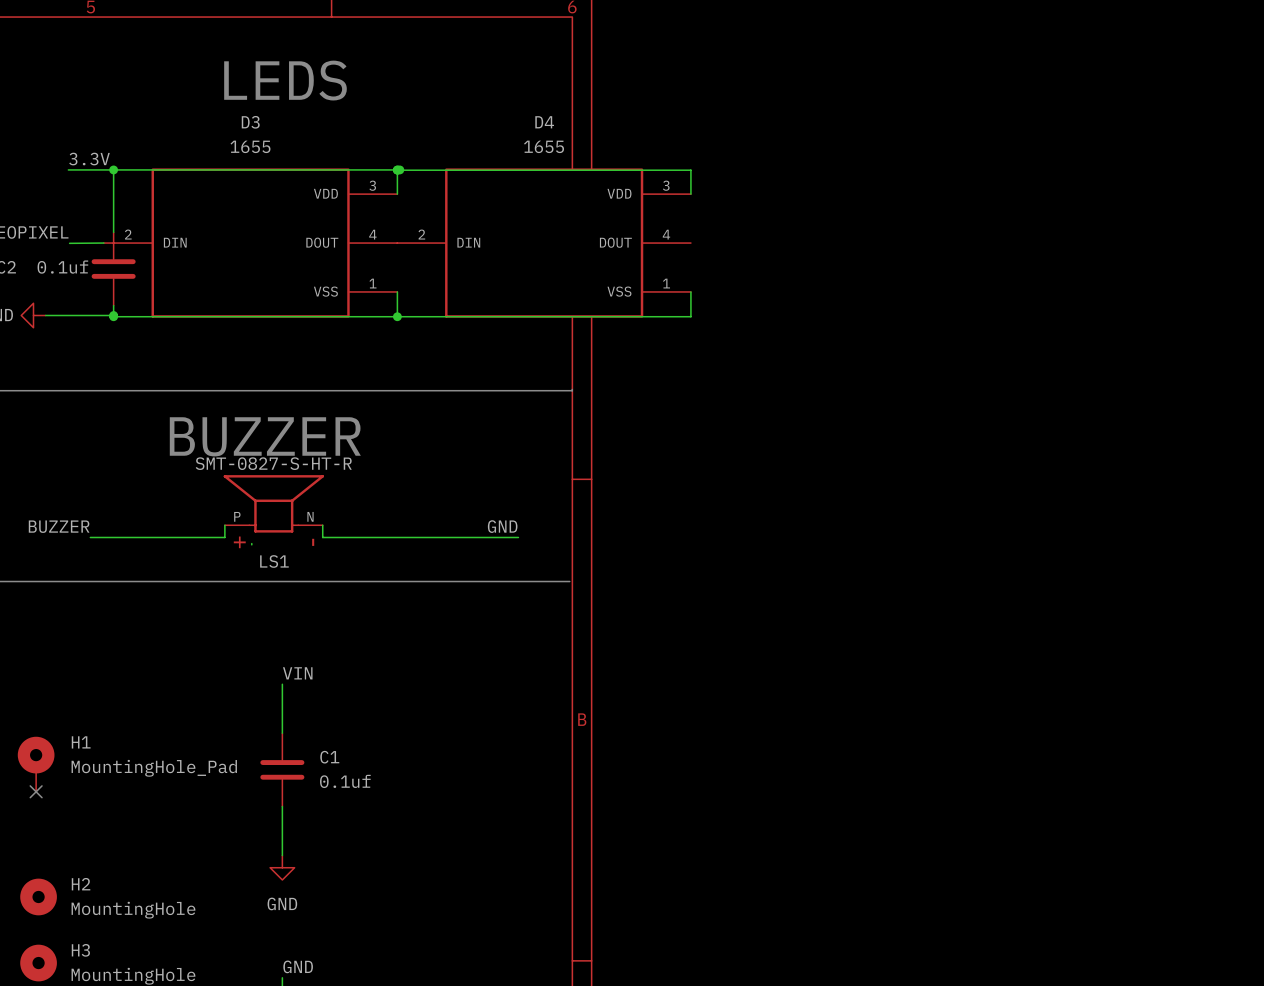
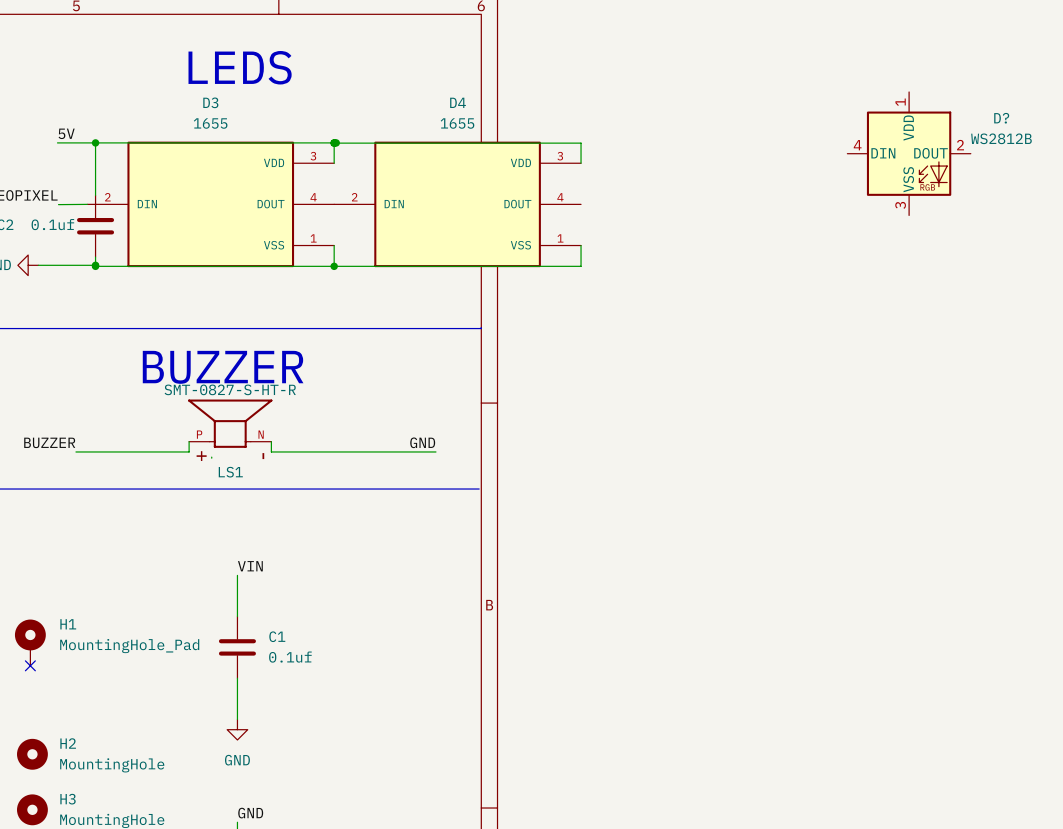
label: 3.3V (89, 159) -> 5V (66, 133)
D?: none -> WS2812B (909, 153)

